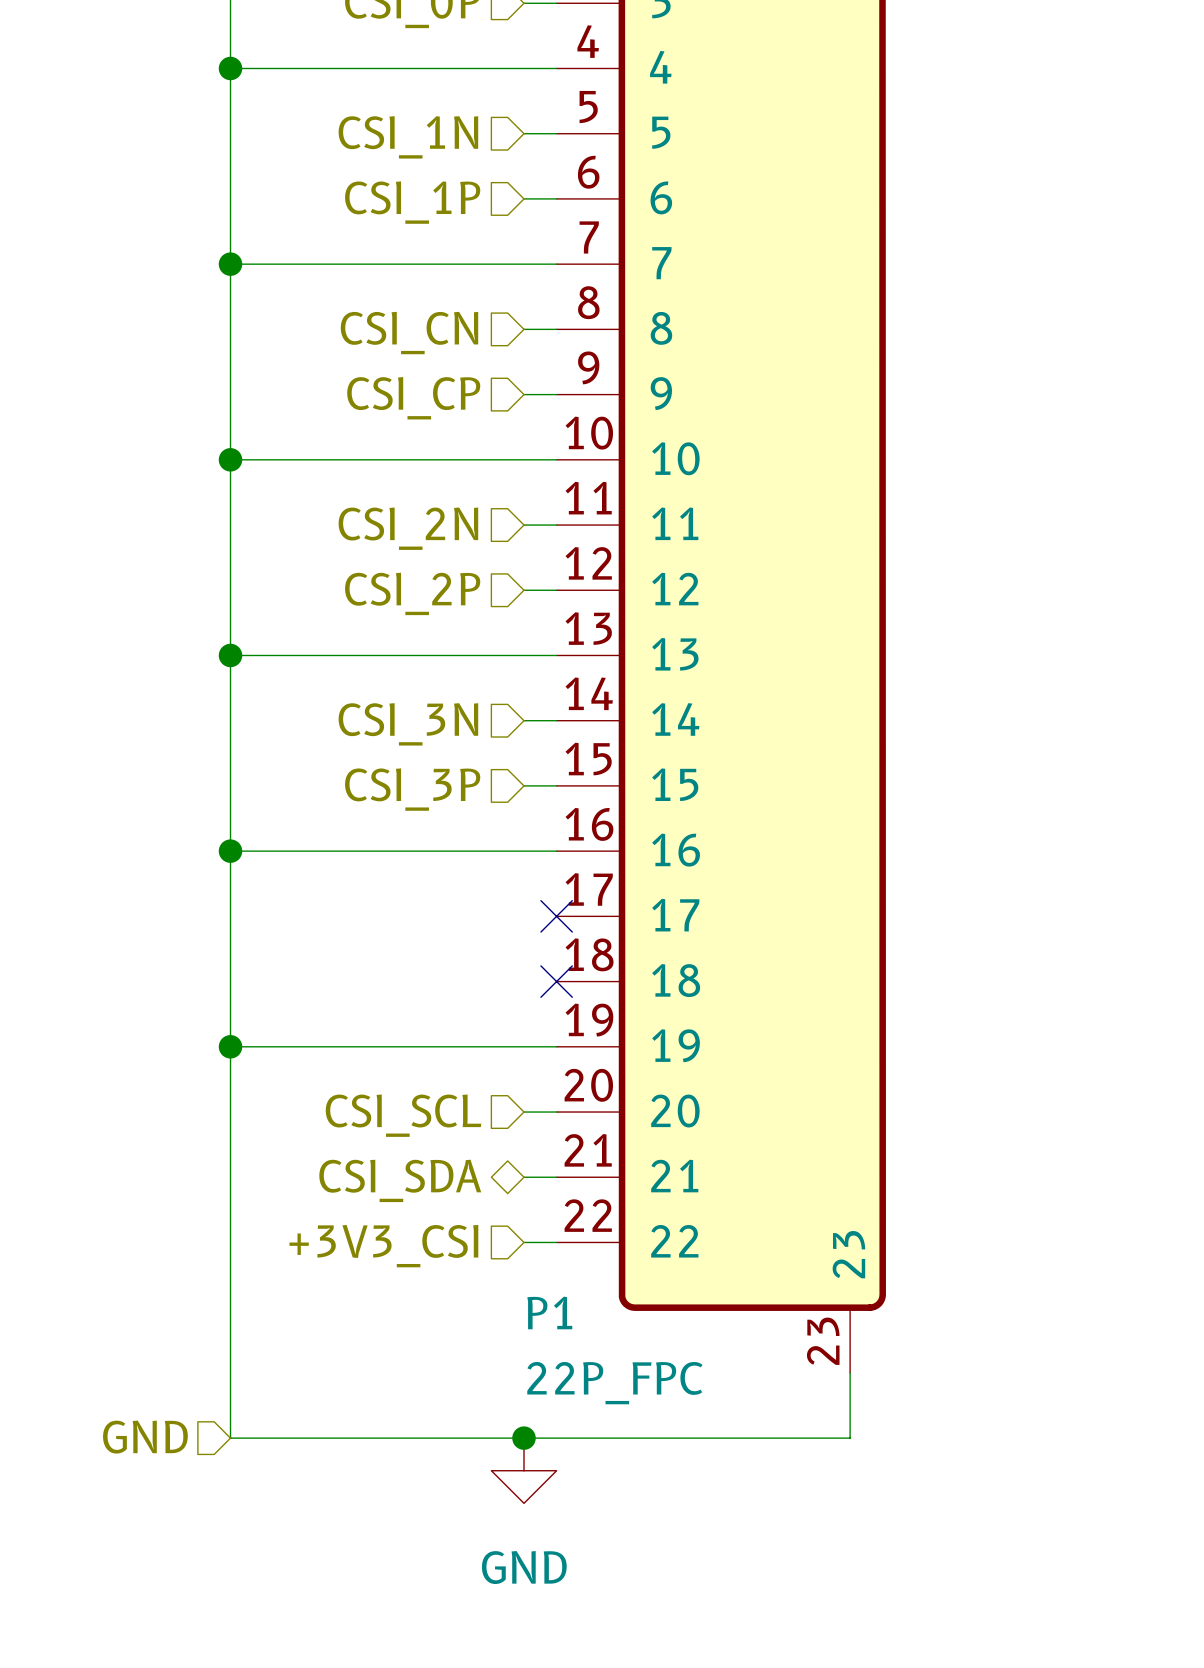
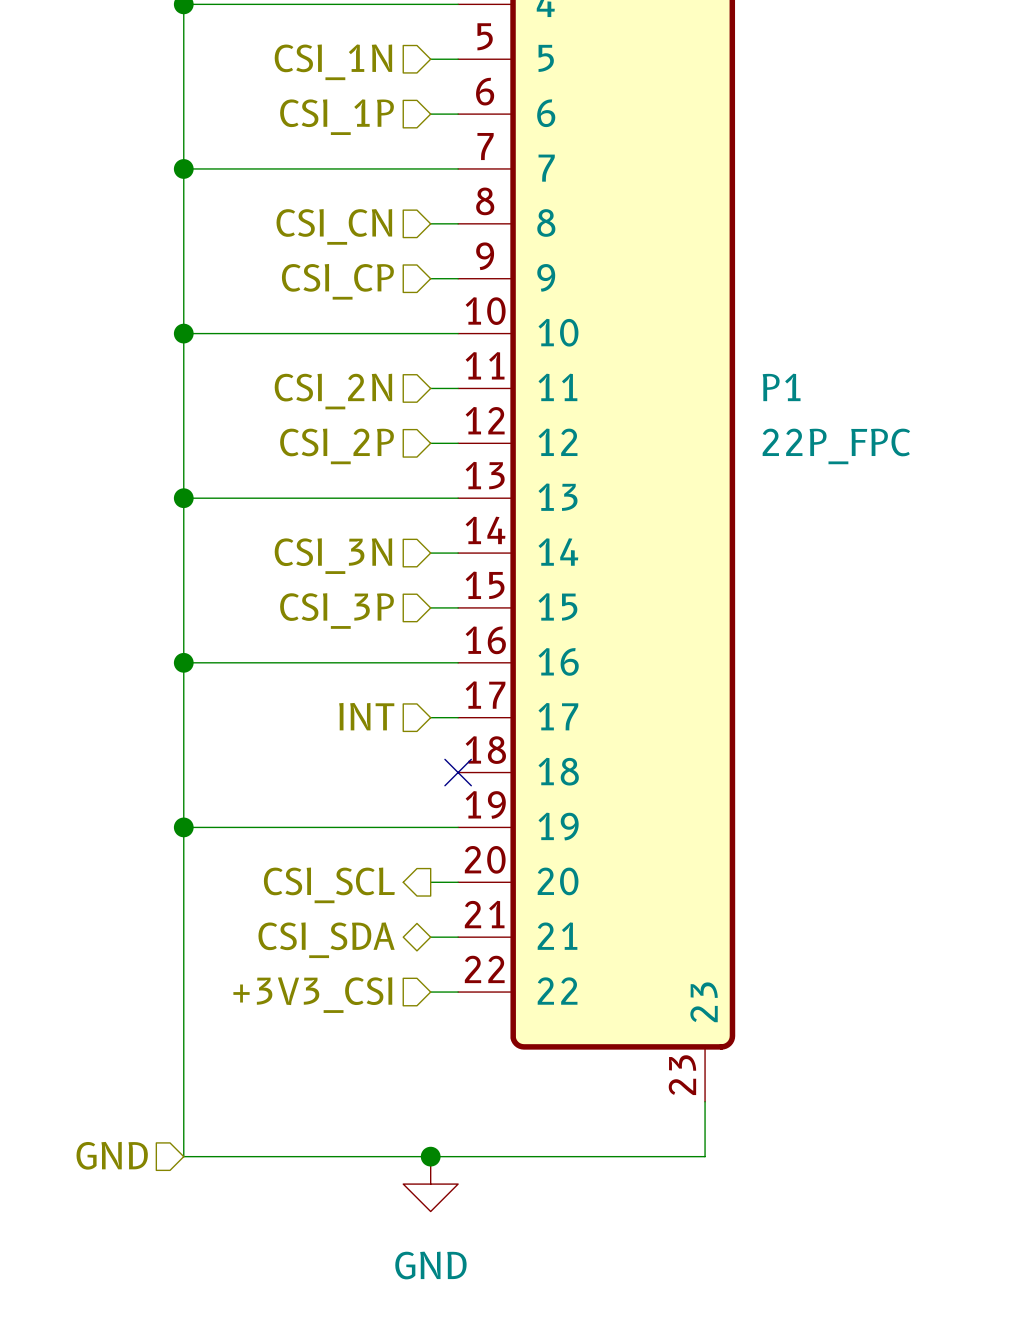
hierarchical label: none -> INT (366, 716)
wire: none -> (430, 717) (458, 717)
no-connect mark: (556, 916) -> none
hierarchical label shape: input (403, 1115) -> output (329, 885)
P1 name position: P1 (549, 1312) -> P1 (781, 387)
P1 value position: 22P_FPC (614, 1383) -> 22P_FPC (836, 446)

